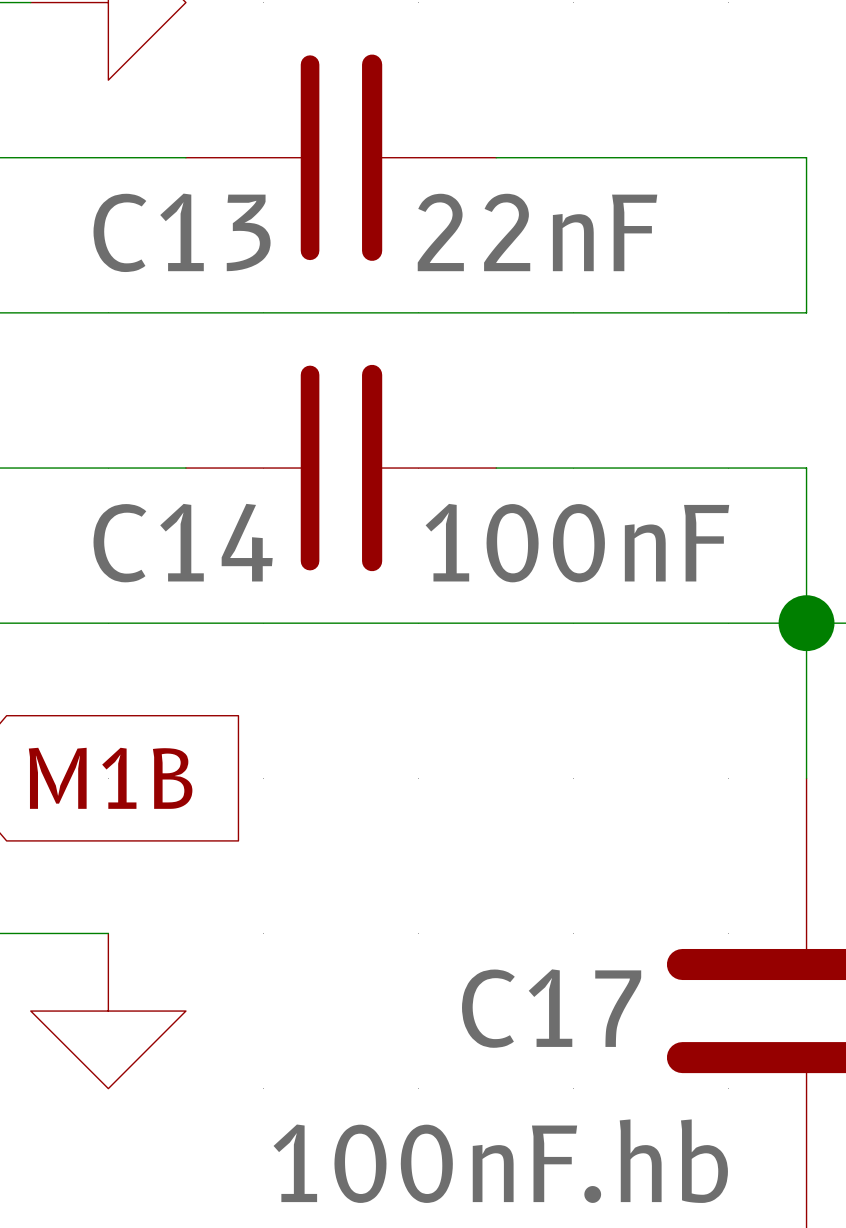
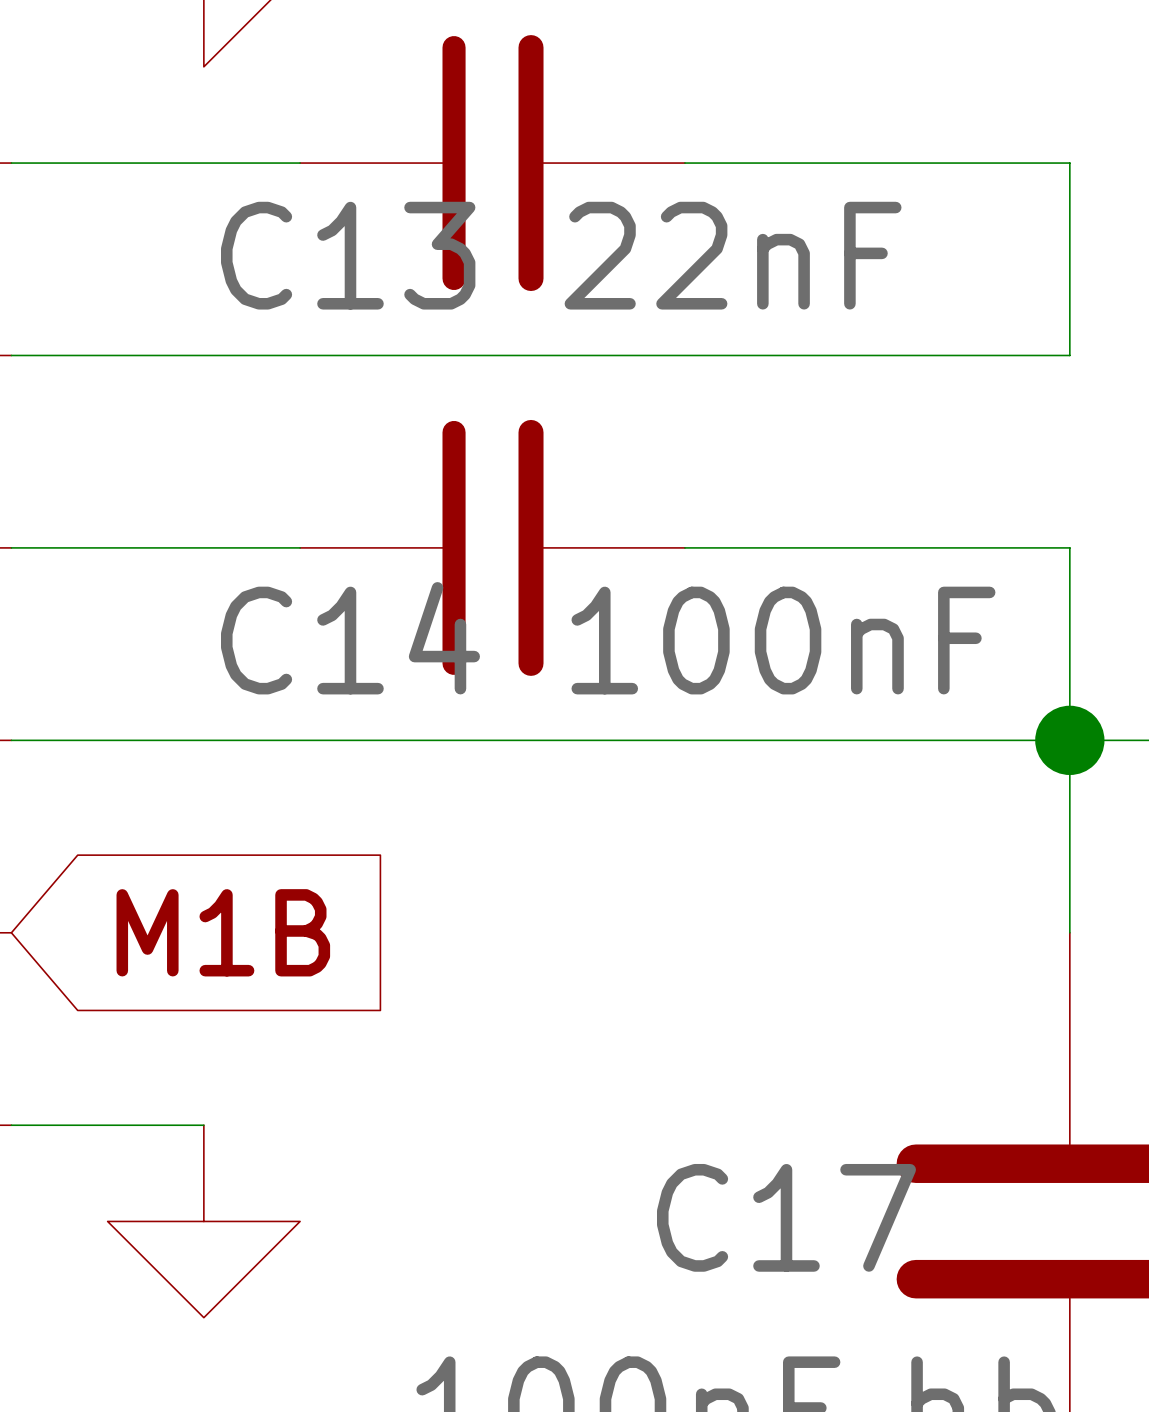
C13 name position: C13 (182, 232) -> C13 (348, 255)
C14 name position: C14 (183, 543) -> C14 (350, 638)

